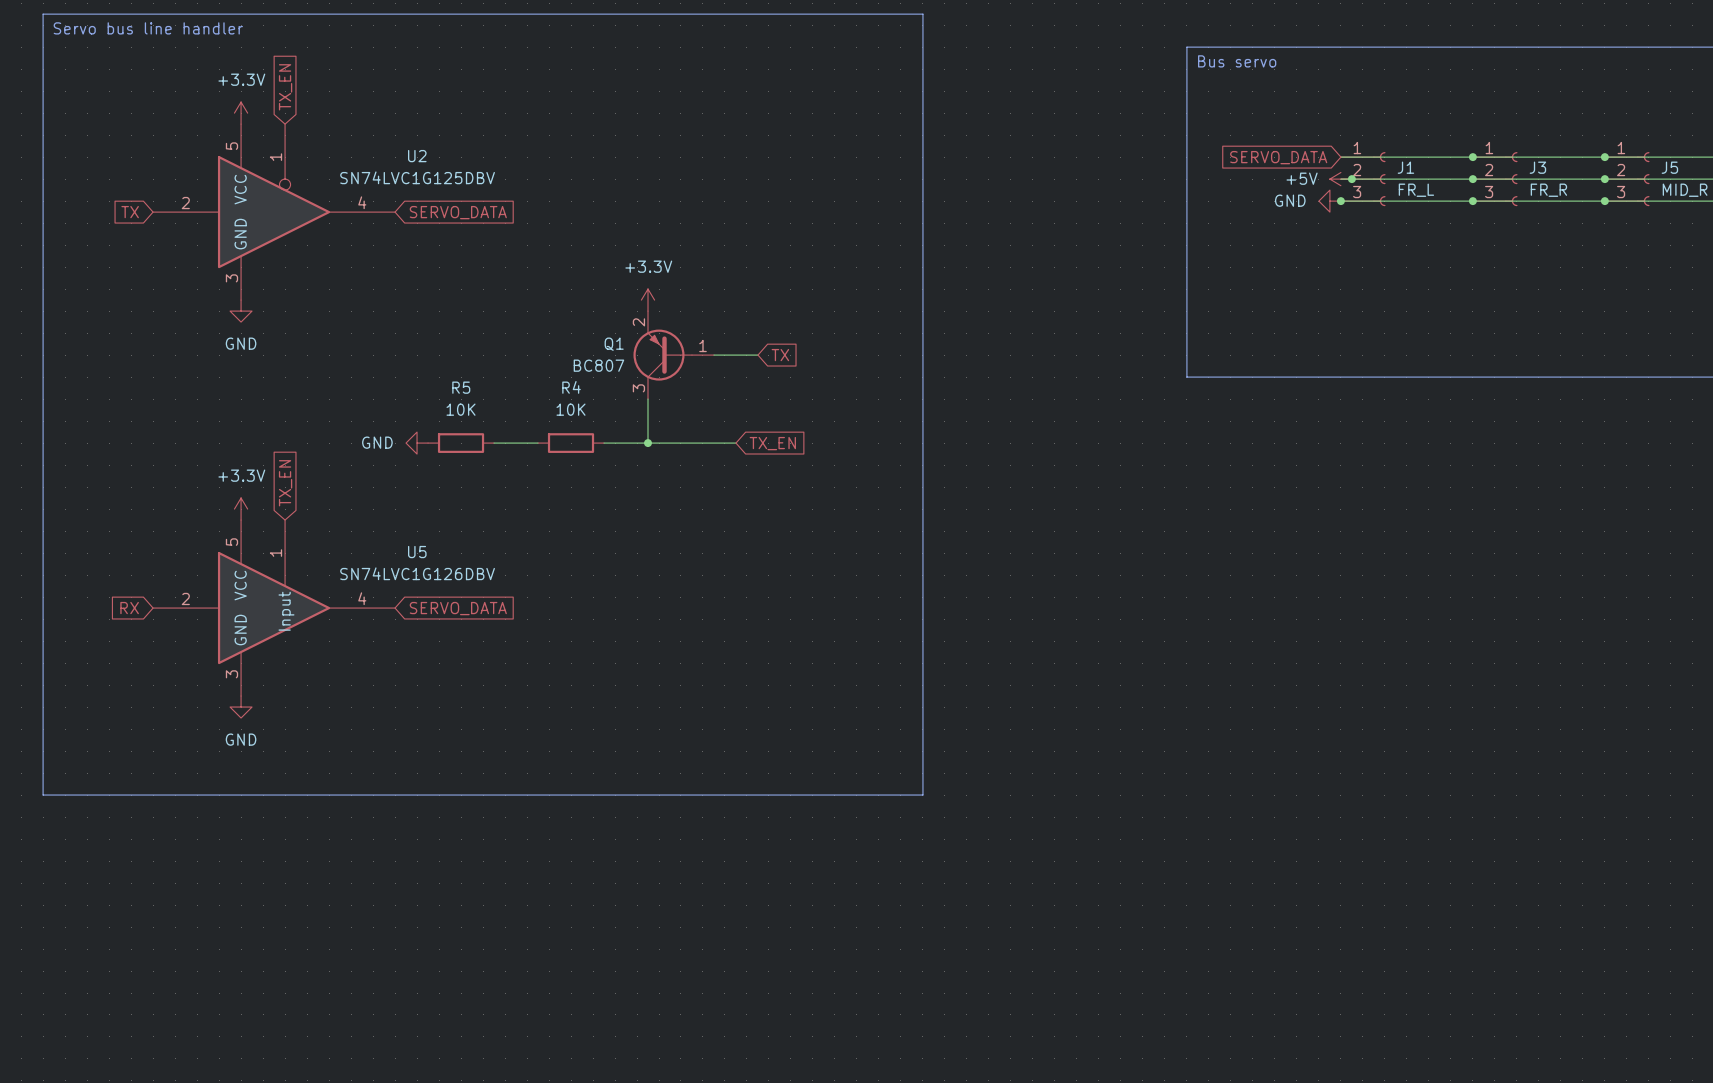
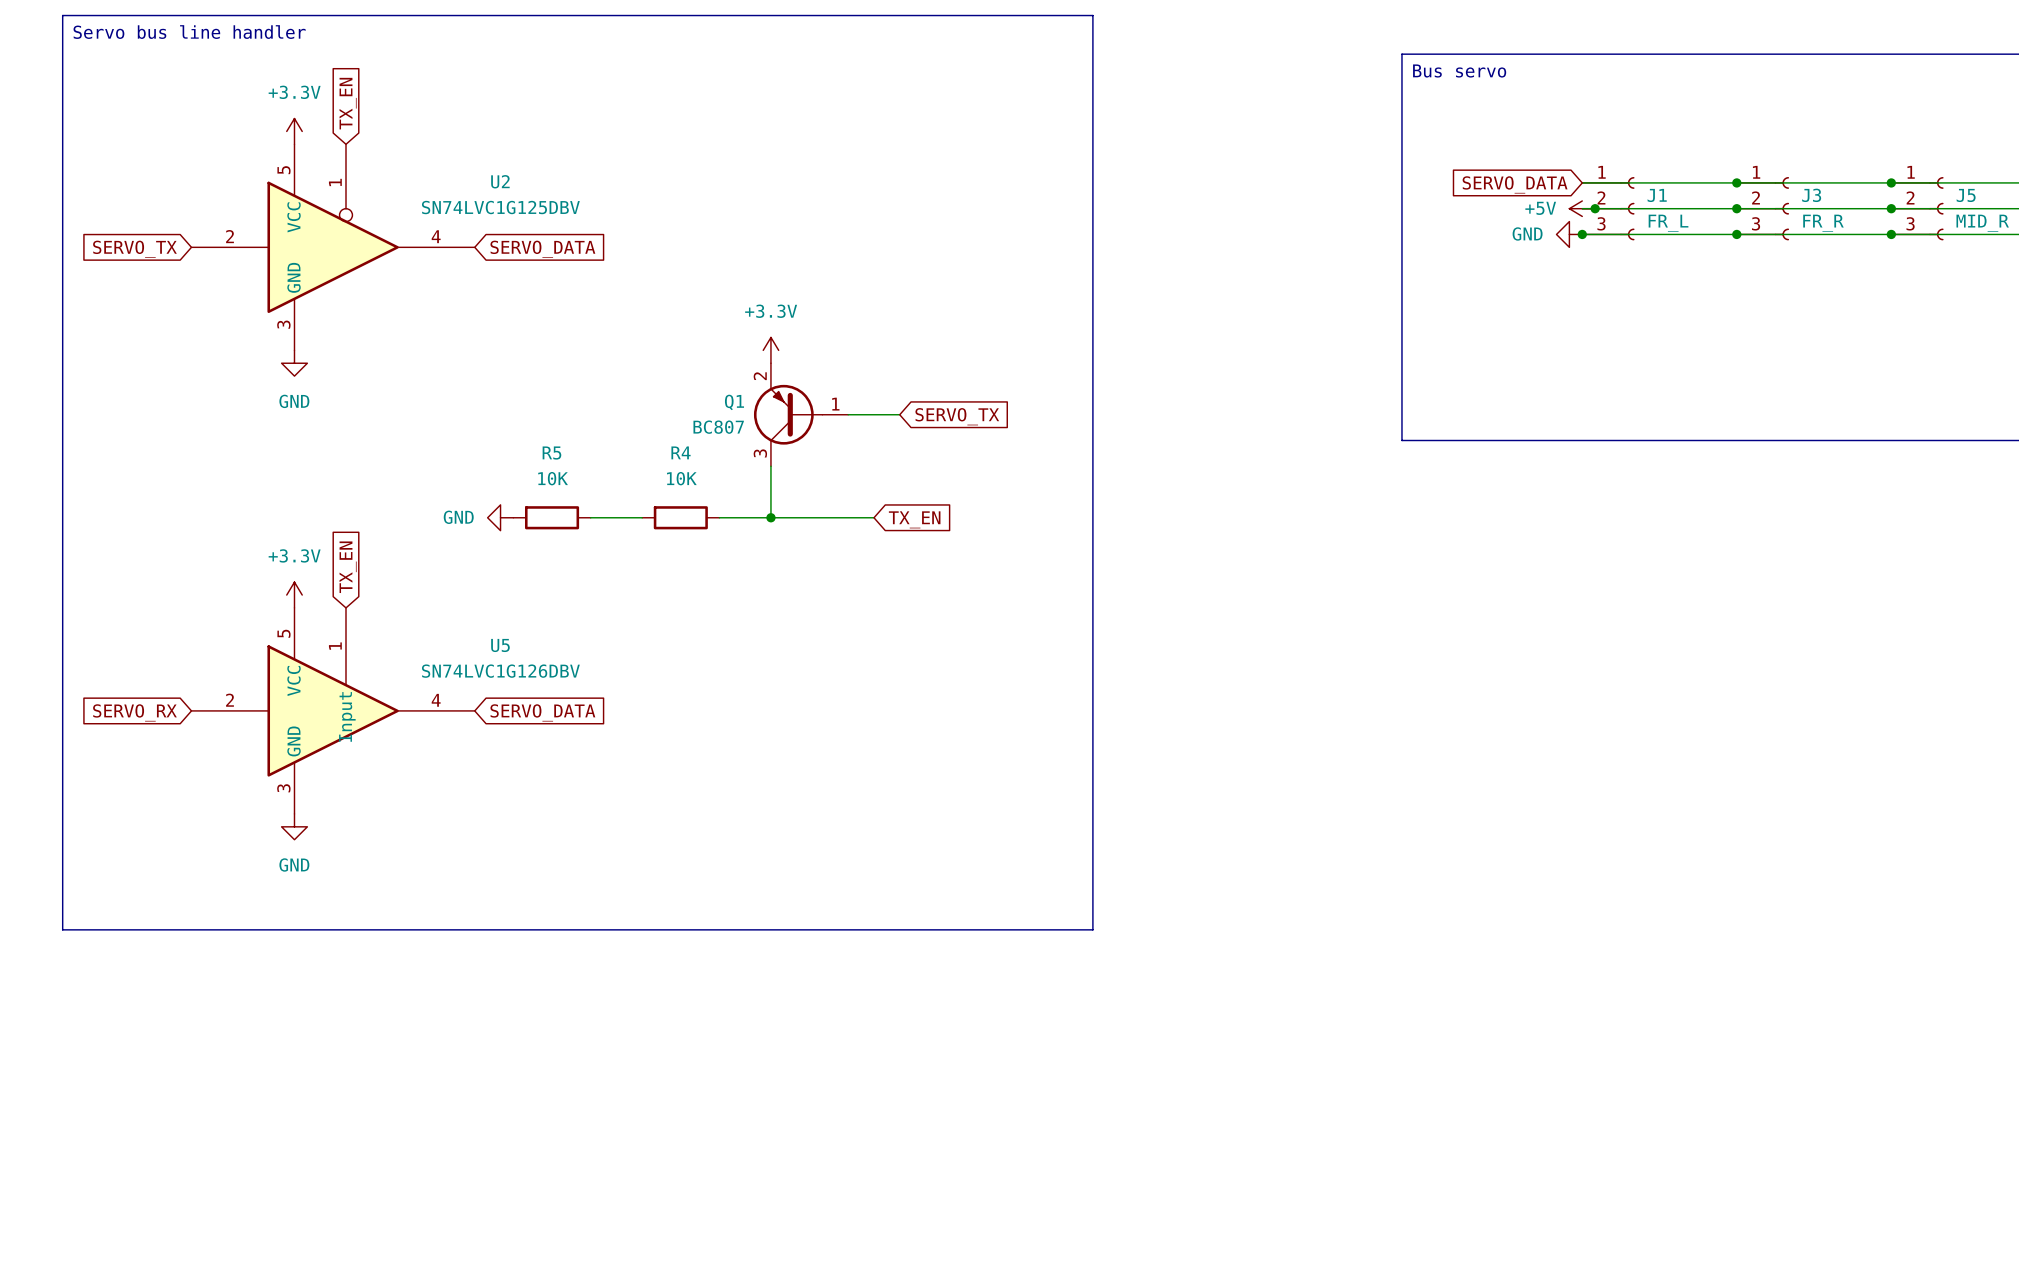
global label: TX (130, 212) -> SERVO_TX (134, 249)
global label: TX (780, 355) -> SERVO_TX (957, 416)
global label: RX (129, 608) -> SERVO_RX (134, 712)

